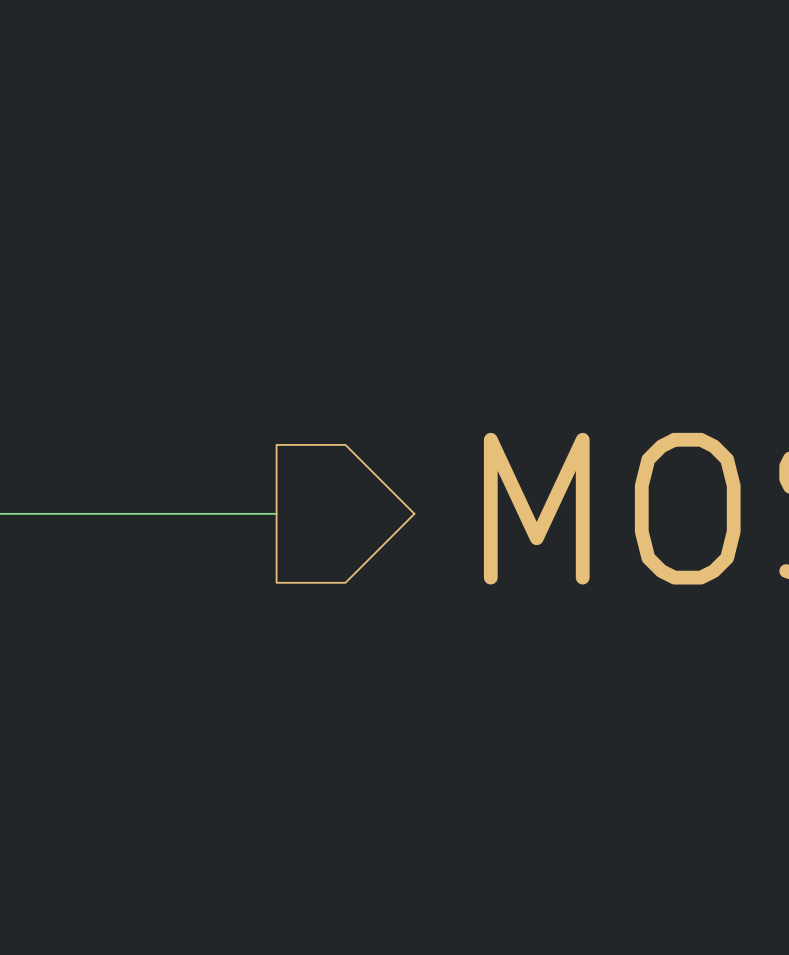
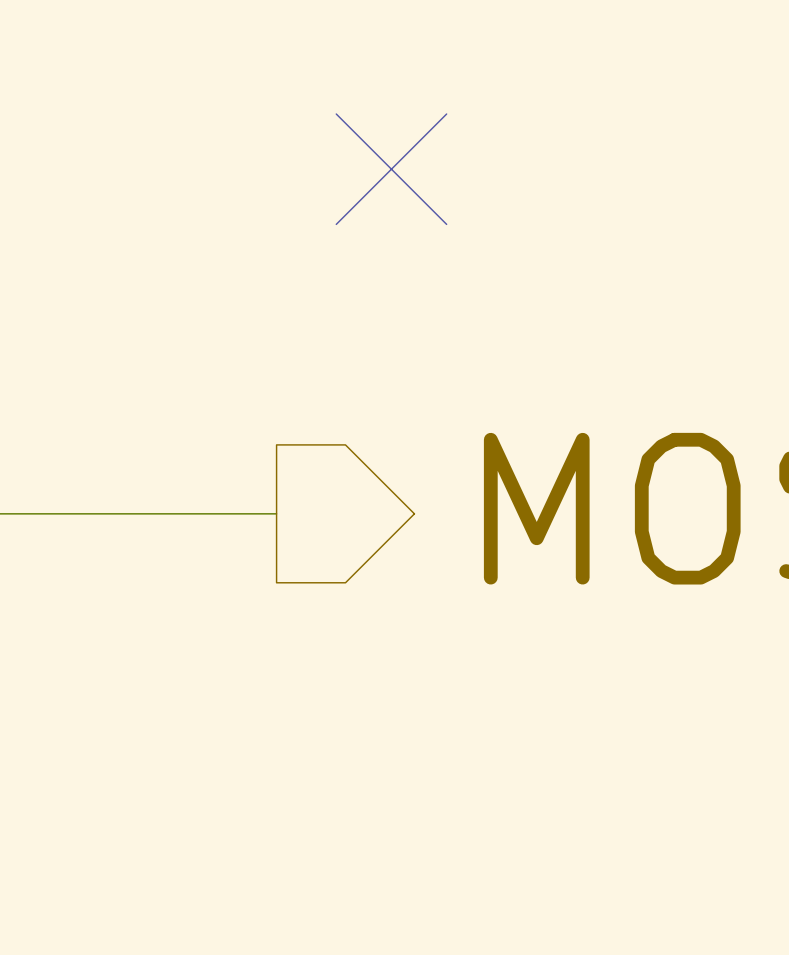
no-connect mark: none -> (391, 169)

